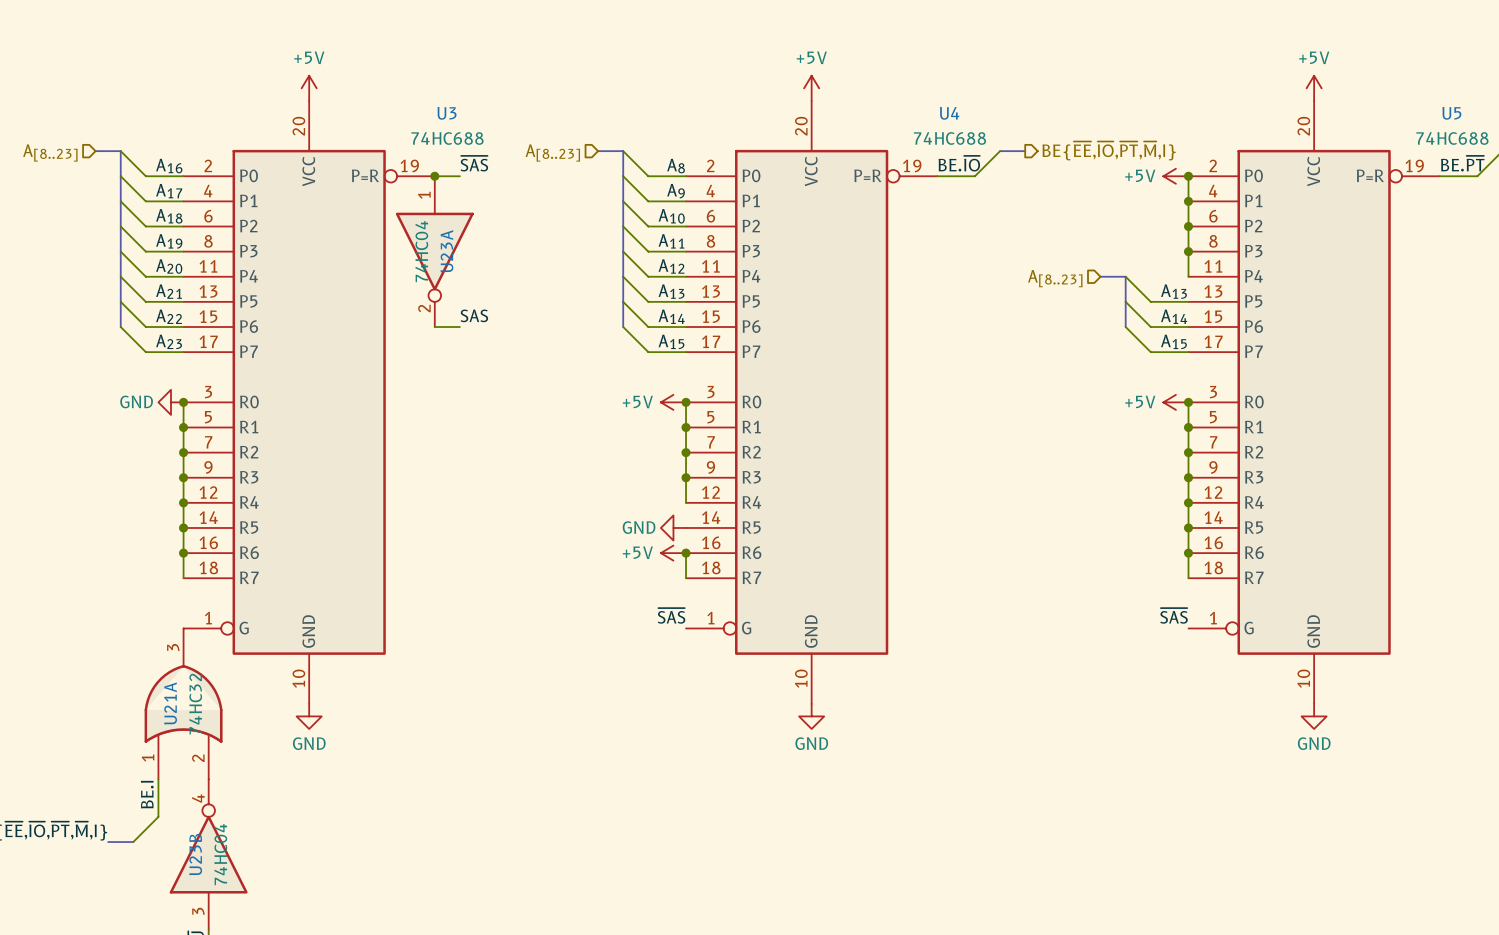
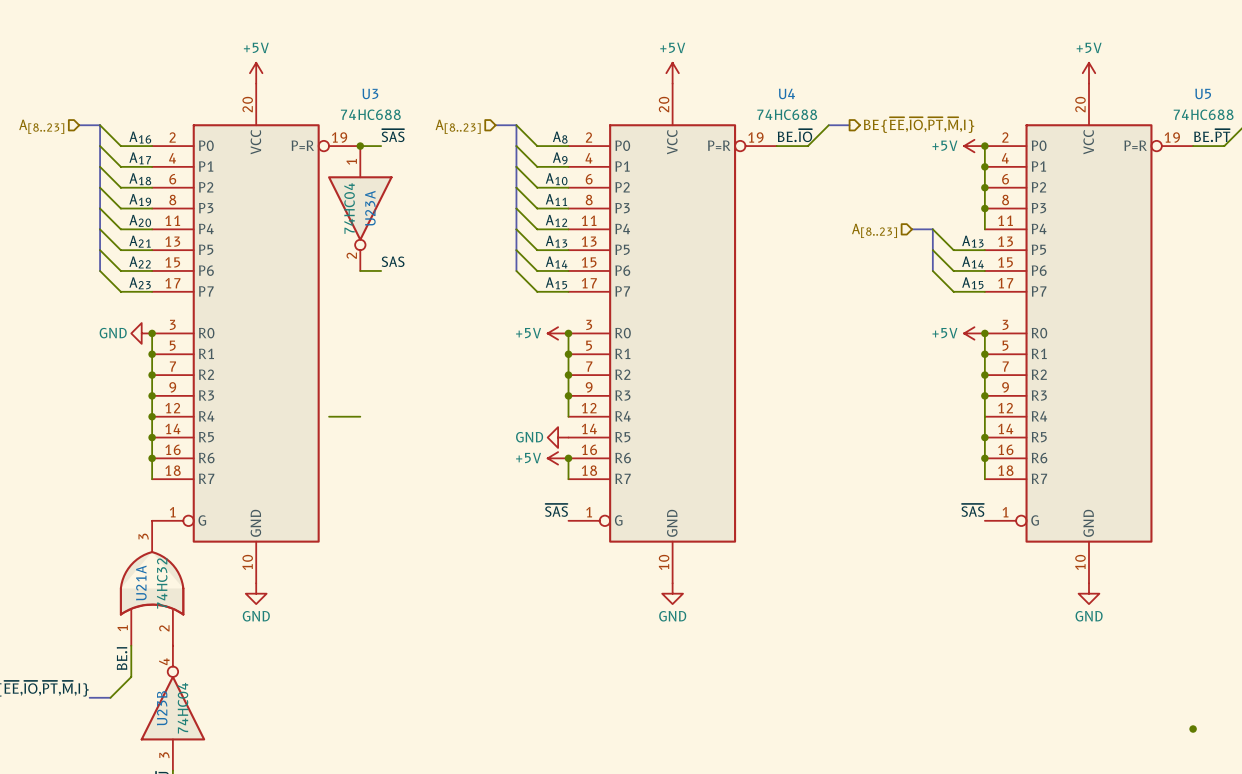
wire: none -> (329, 416) (360, 416)
junction: (1188, 502) -> none
junction: none -> (1193, 729)

